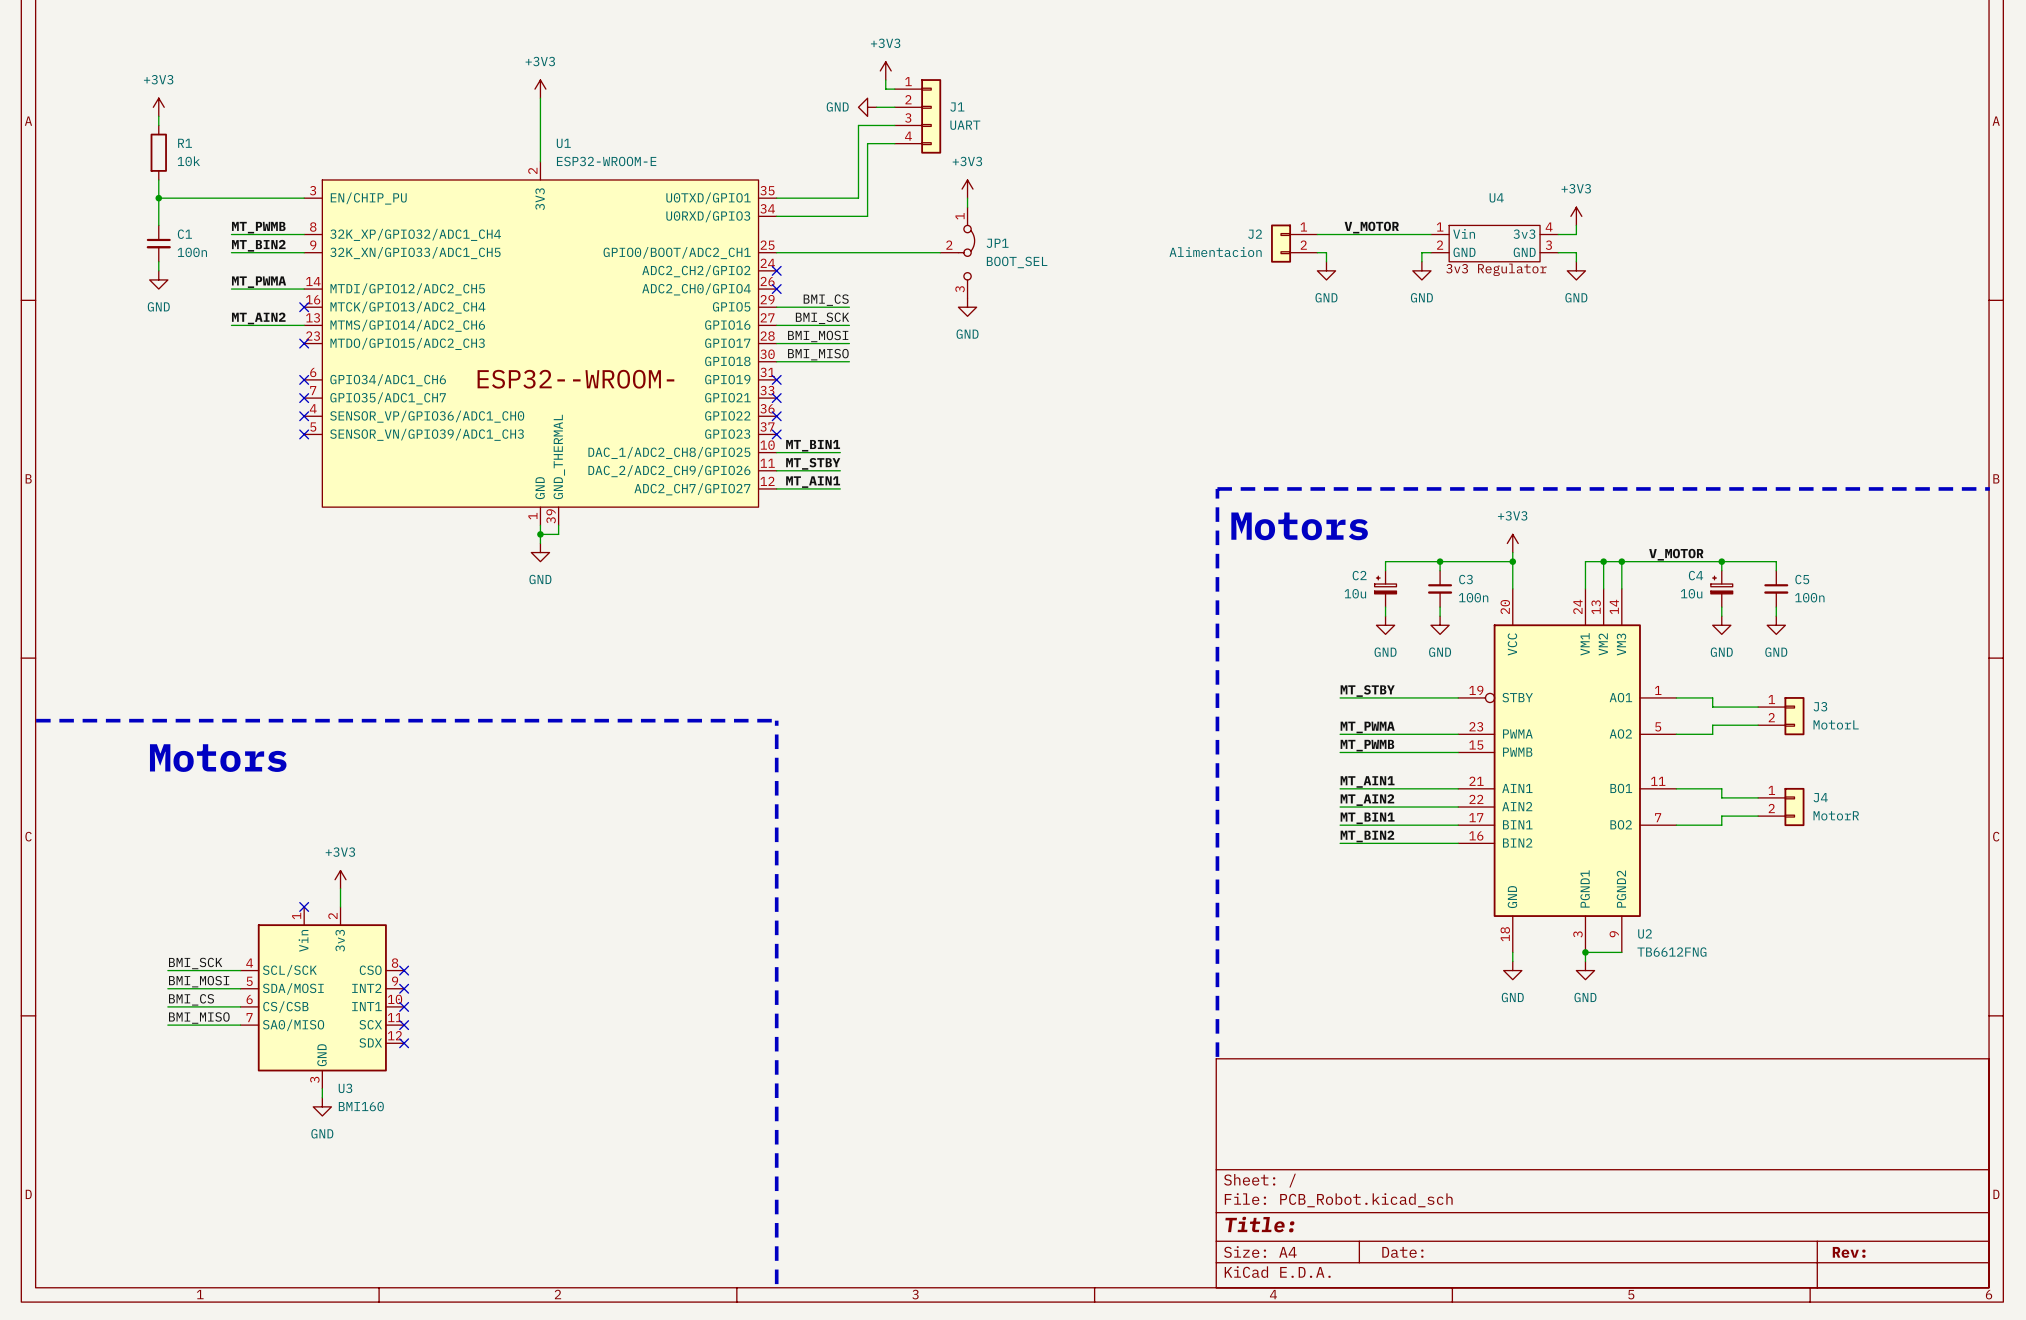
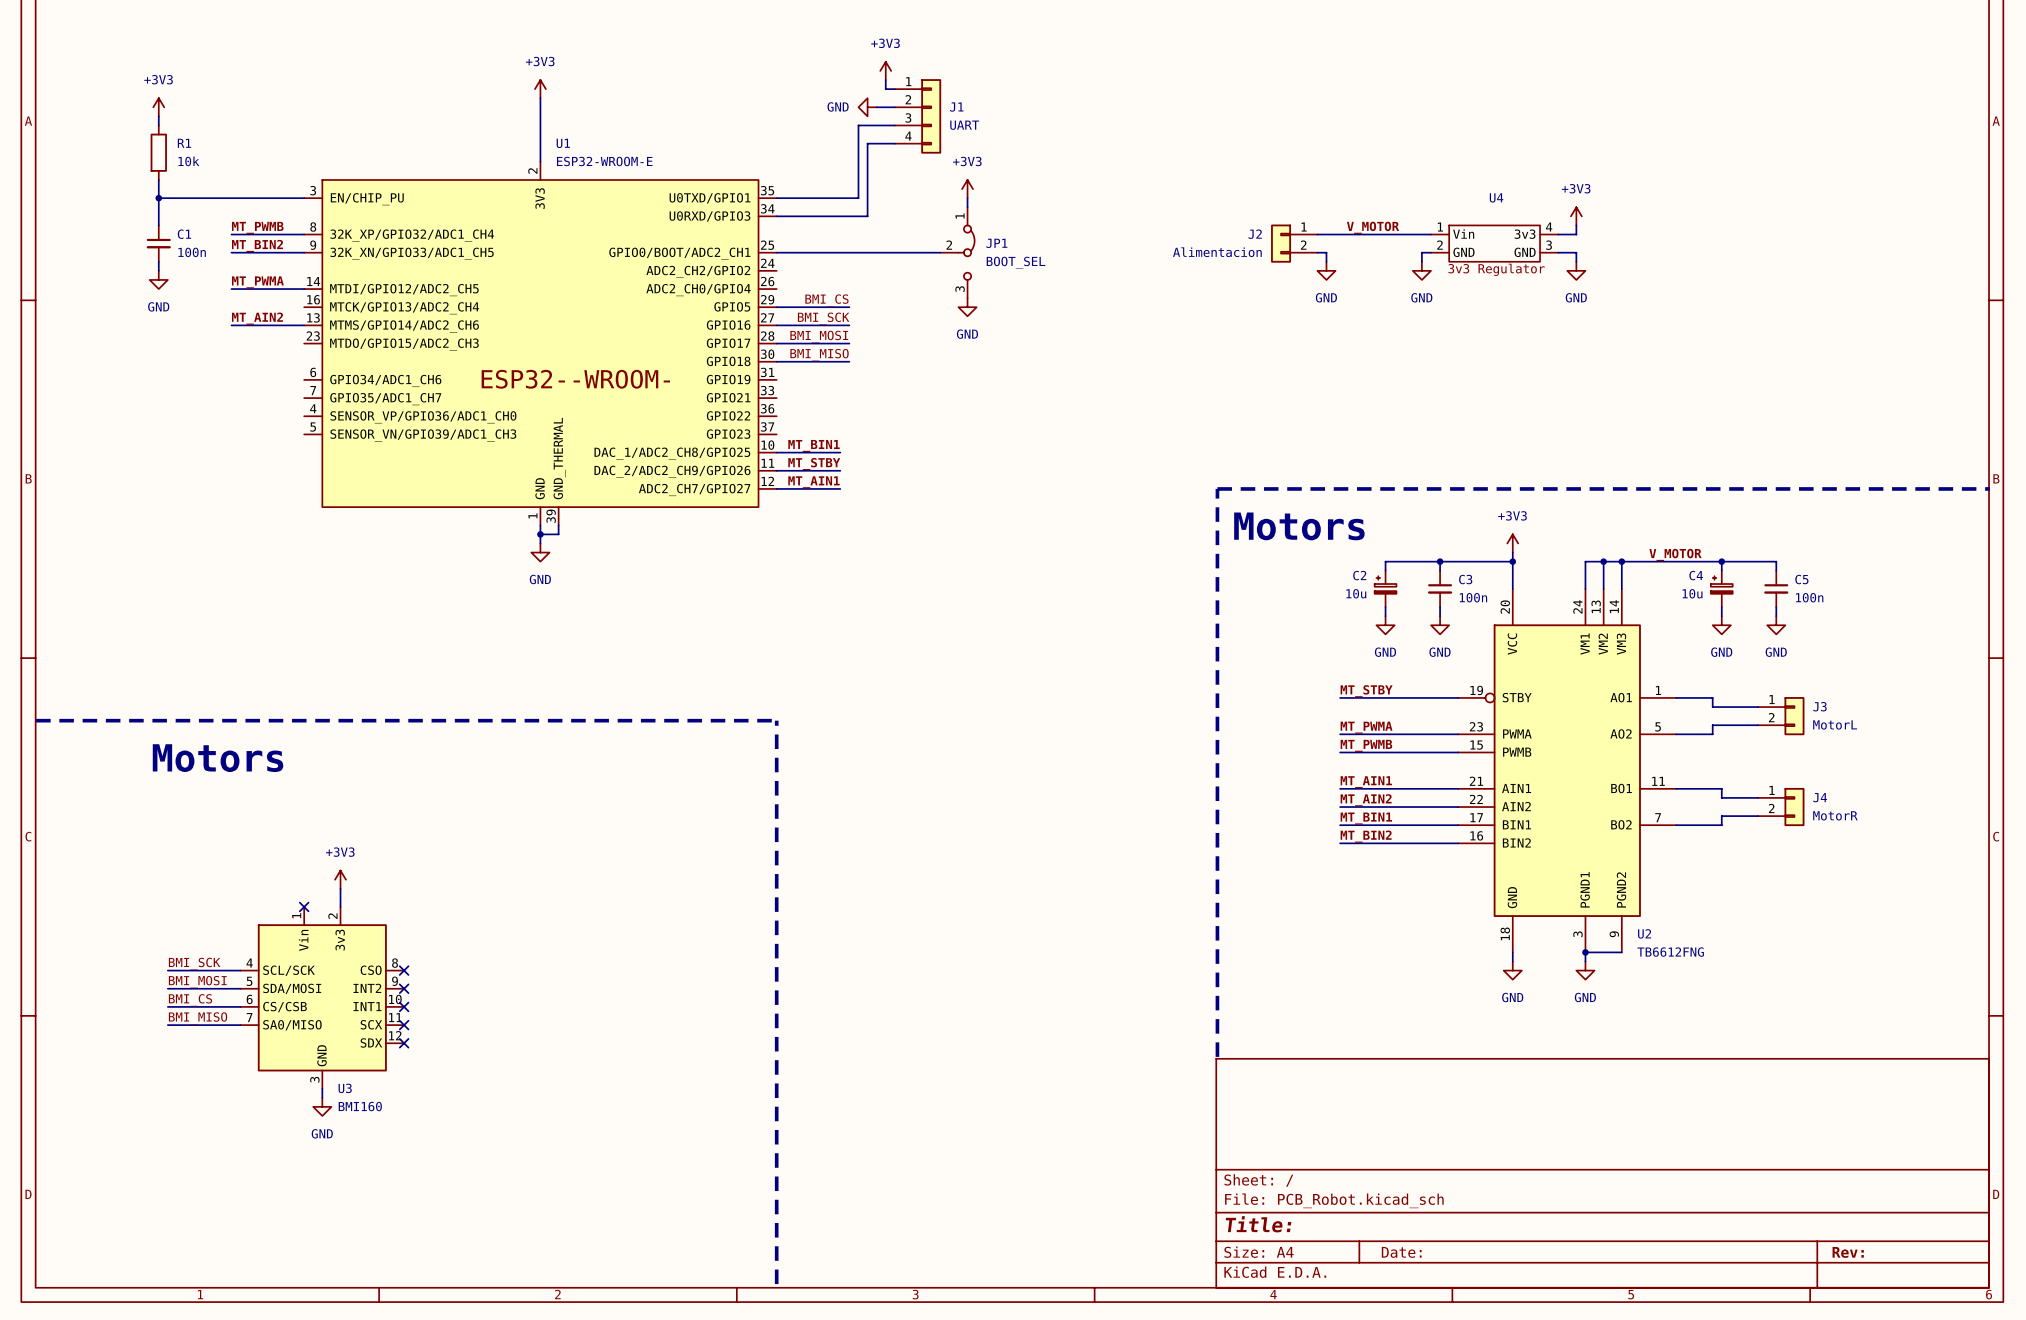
no-connect mark: (776, 270) -> none
no-connect mark: (776, 289) -> none
no-connect mark: (304, 307) -> none
no-connect mark: (304, 343) -> none
no-connect mark: (304, 379) -> none
no-connect mark: (776, 379) -> none
no-connect mark: (304, 398) -> none
no-connect mark: (776, 398) -> none
no-connect mark: (304, 416) -> none
no-connect mark: (776, 416) -> none
no-connect mark: (304, 434) -> none
no-connect mark: (776, 434) -> none

